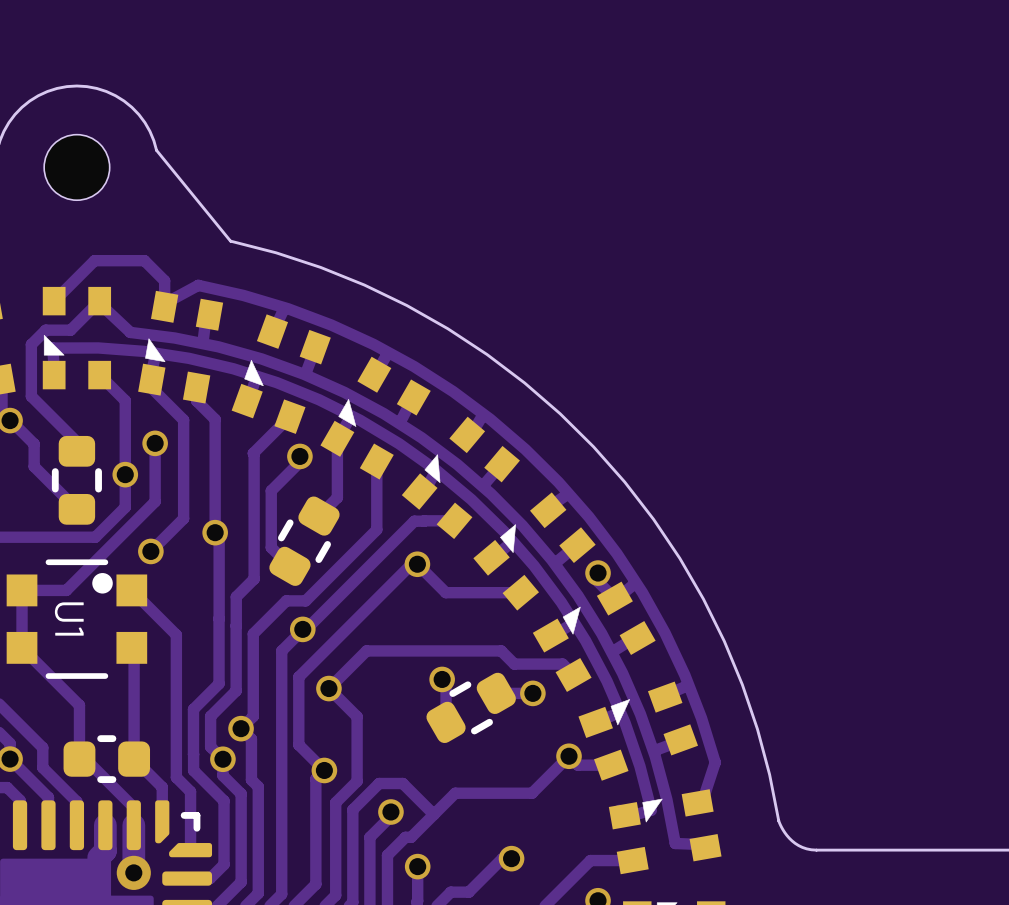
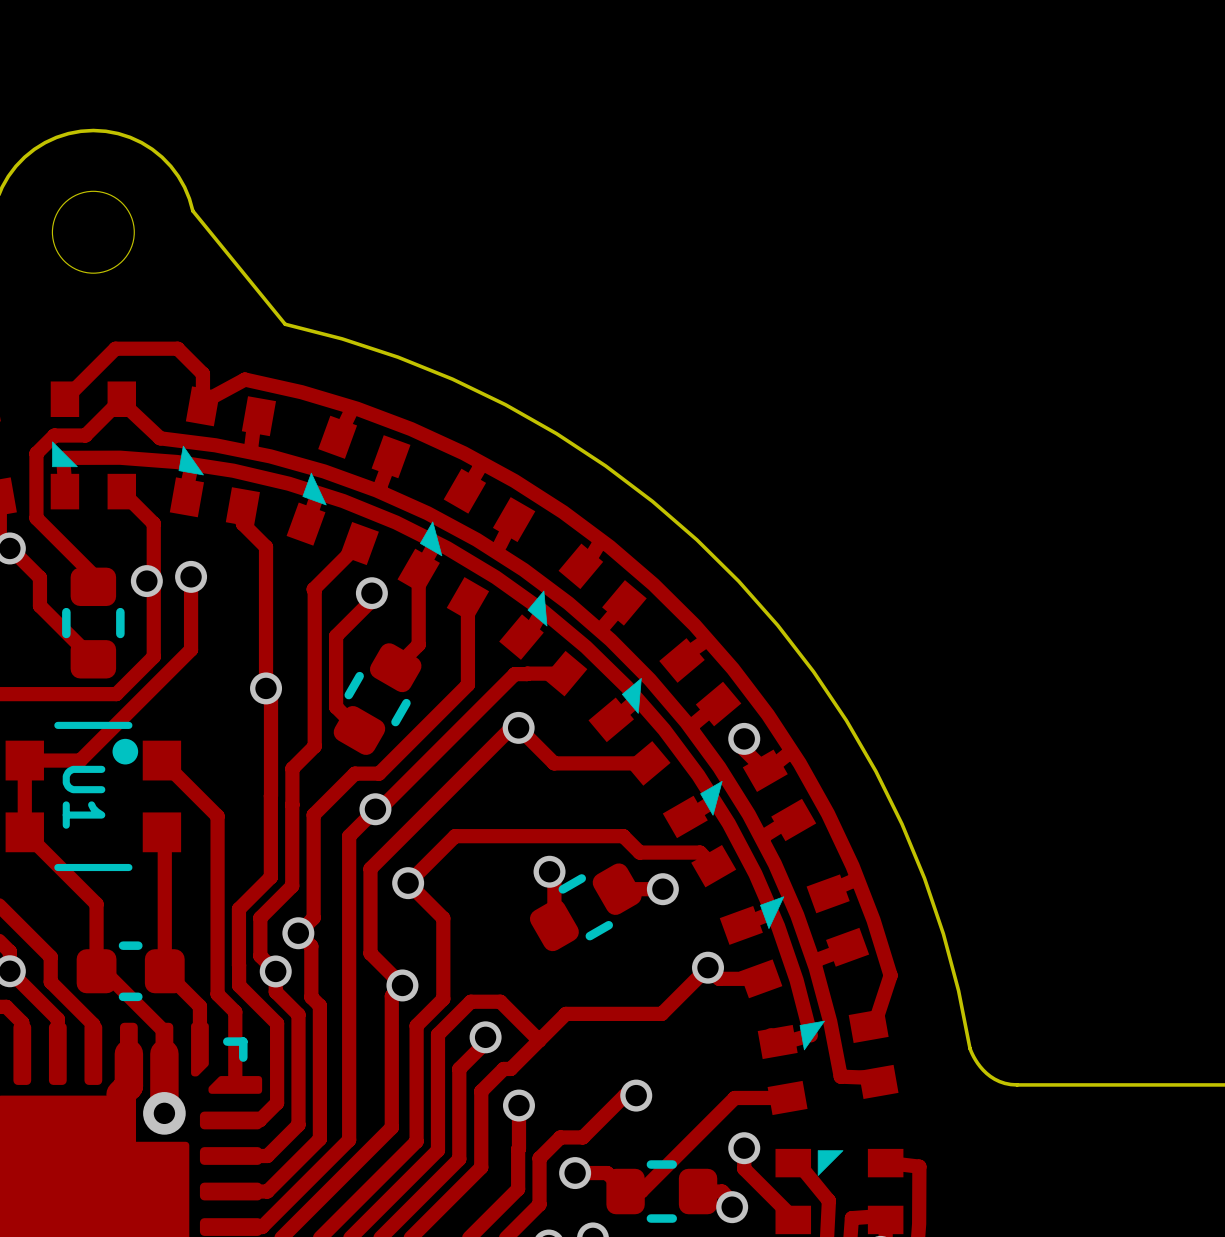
track: (151, 379) (151, 388) (183, 420) (183, 518) (150, 551) -> none
via position: (125, 474) -> (146, 581)
via: (150, 551) -> none

